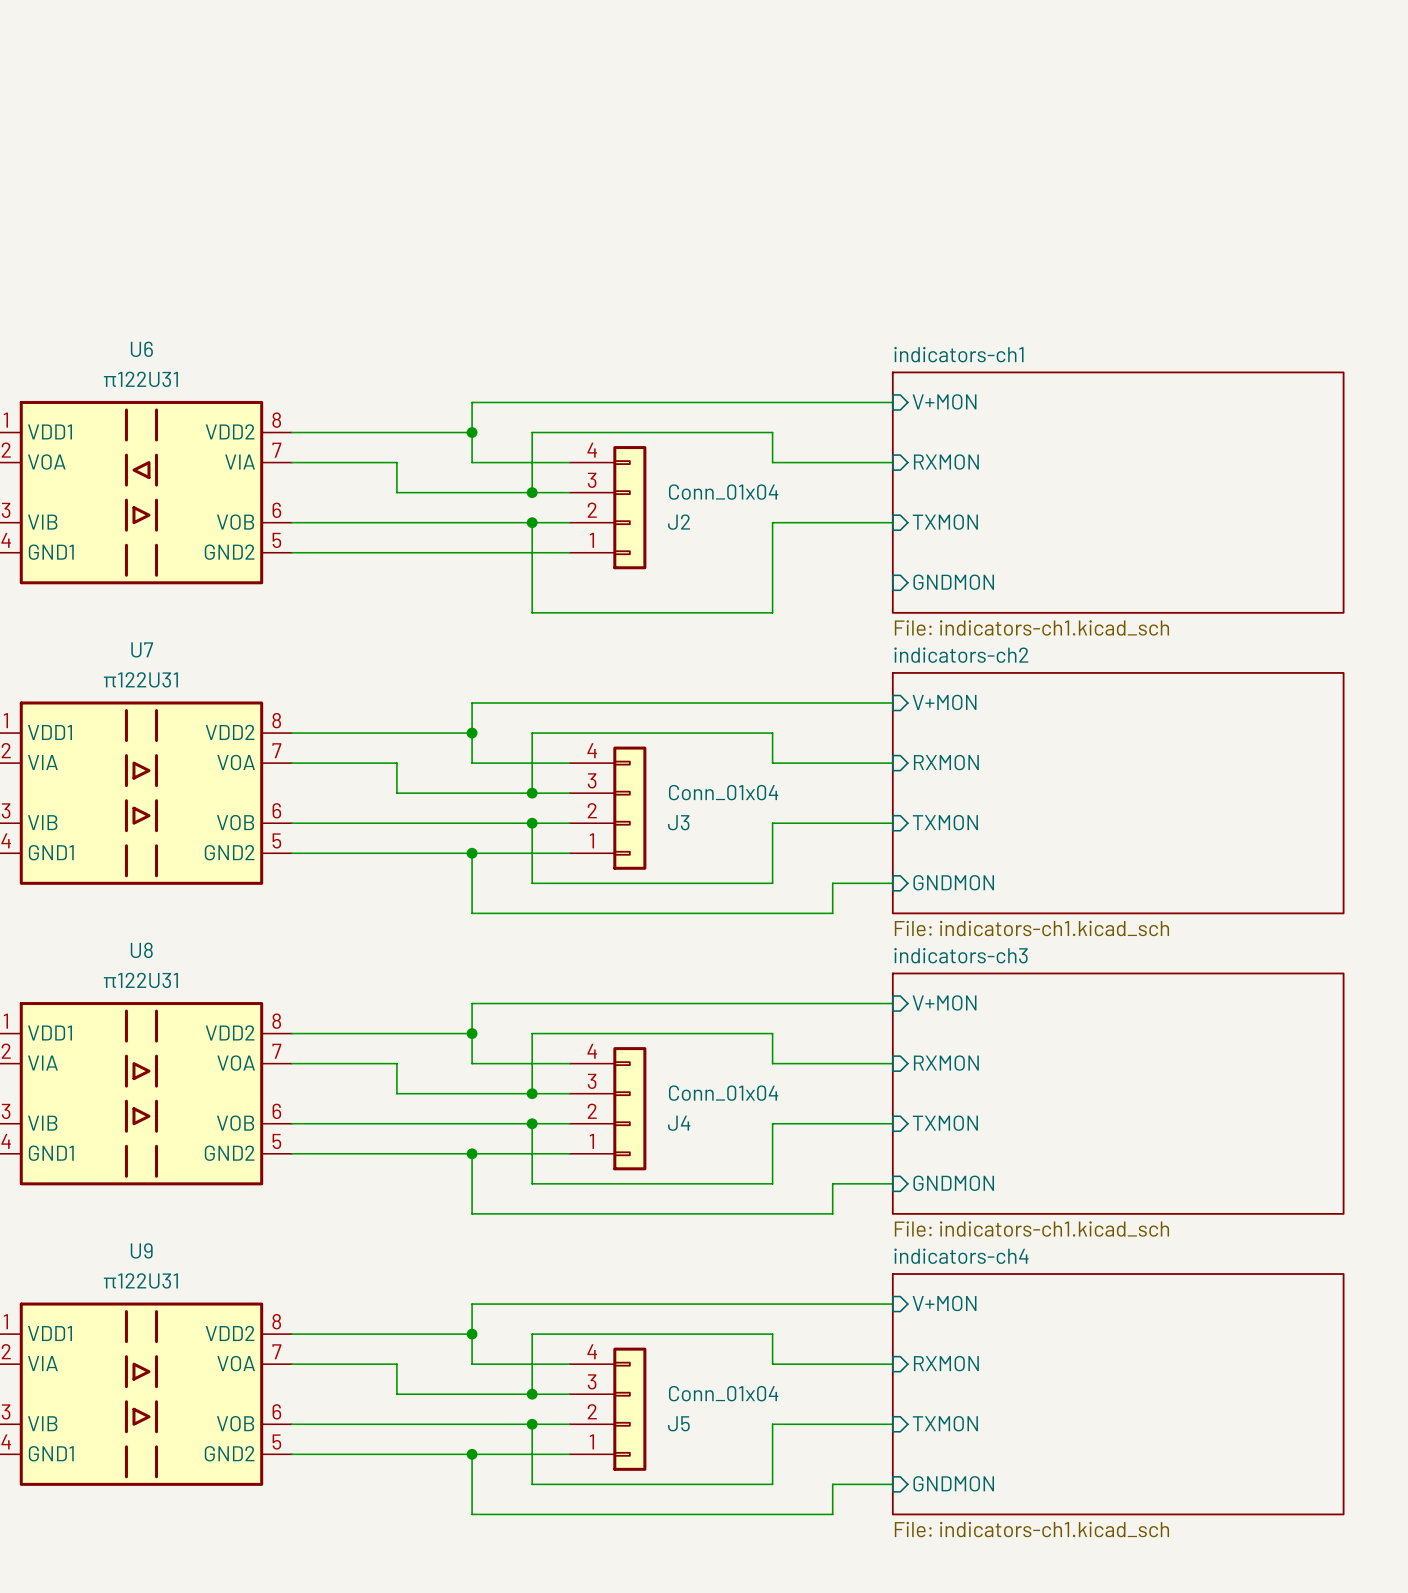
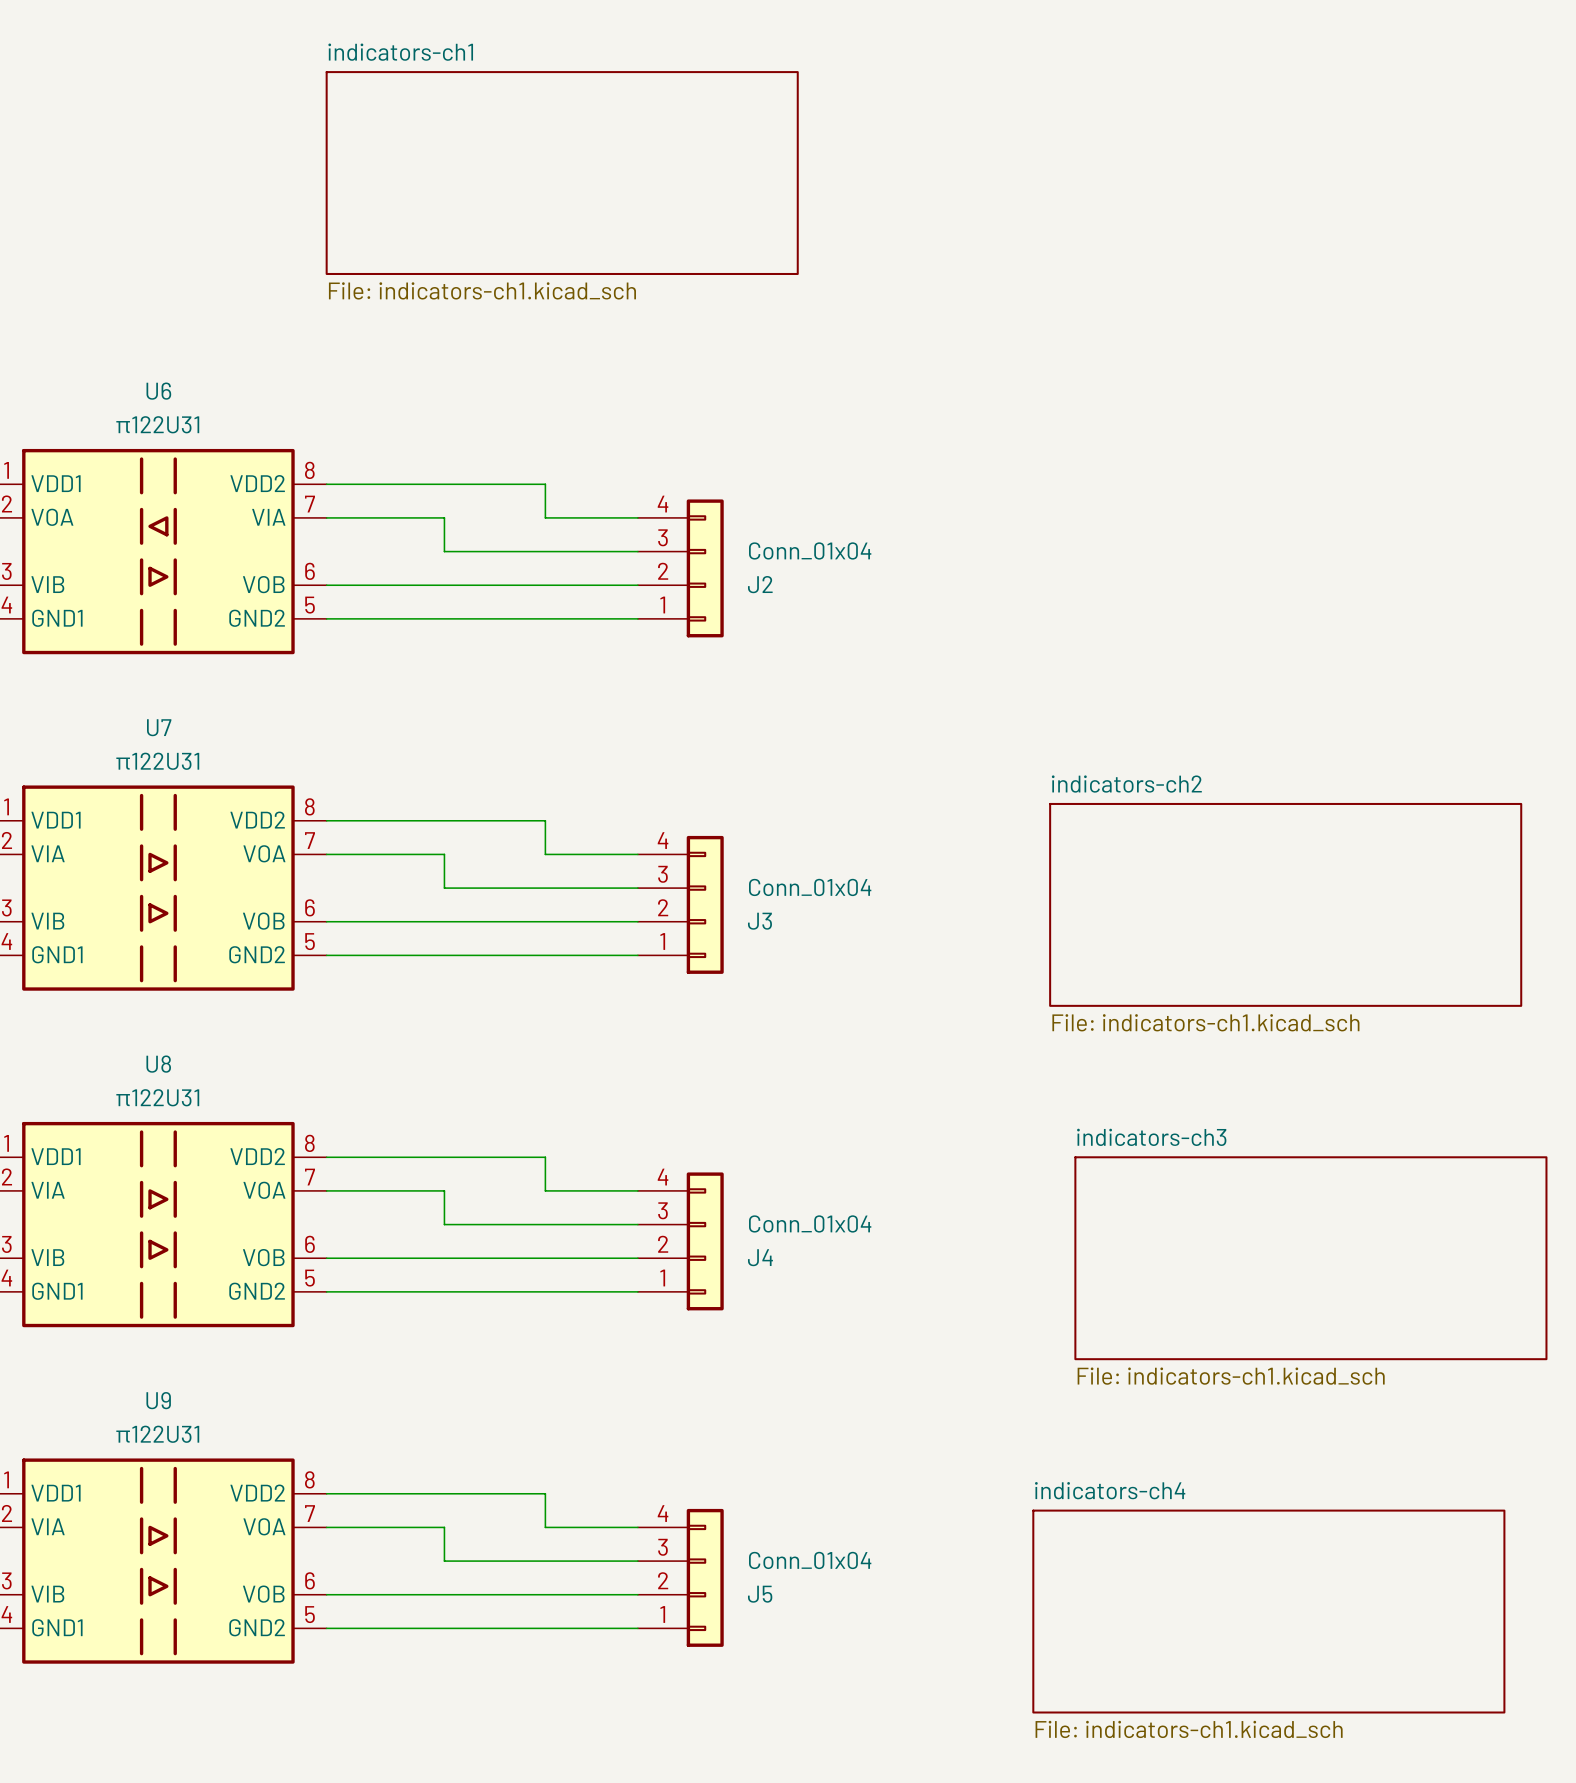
sheet indicators-ch1 name position: indicators-ch1 (958, 354) -> indicators-ch1 (400, 52)
sheet indicators-ch1 shape: [891, 371, 1345, 614] -> [325, 71, 799, 275]
sheet pin: V+MON (944, 401) -> none
wire: (892, 402) (472, 402) (472, 462) (487, 462) -> (528, 484) (545, 484) (545, 517)
junction: (472, 432) -> none
wire: (892, 462) (772, 462) (772, 432) (532, 432) (532, 492) -> none
sheet pin: RXMON (946, 462) -> none
junction: (532, 492) -> none
wire: (532, 522) (532, 612) (772, 612) (772, 522) (892, 522) -> none
junction: (532, 522) -> none
sheet pin: TXMON (945, 522) -> none
sheet pin: GNDMON (953, 582) -> none
sheet indicators-ch1 value position: File: indicators-ch1.kicad_sch (1031, 627) -> File: indicators-ch1.kicad_sch (482, 290)
sheet indicators-ch2 name position: indicators-ch2 (961, 655) -> indicators-ch2 (1126, 784)
sheet indicators-ch2 shape: [891, 672, 1345, 915] -> [1049, 802, 1523, 1007]
sheet pin: V+MON (944, 702) -> none
wire: (892, 703) (472, 703) (472, 763) (487, 763) -> (528, 820) (545, 820) (545, 854)
junction: (472, 733) -> none
sheet pin: RXMON (946, 762) -> none
wire: (892, 763) (772, 763) (772, 733) (532, 733) (532, 793) -> none
junction: (532, 793) -> none
sheet pin: TXMON (945, 822) -> none
wire: (532, 823) (532, 883) (772, 883) (772, 823) (892, 823) -> none
junction: (532, 823) -> none
wire: (472, 853) (472, 913) (832, 913) (832, 883) (892, 883) -> none
junction: (472, 853) -> none
sheet pin: GNDMON (953, 882) -> none
sheet indicators-ch2 value position: File: indicators-ch1.kicad_sch (1031, 928) -> File: indicators-ch1.kicad_sch (1205, 1022)
sheet indicators-ch3 name position: indicators-ch3 (961, 955) -> indicators-ch3 (1151, 1137)
sheet indicators-ch3 shape: [891, 972, 1345, 1215] -> [1074, 1156, 1548, 1361]
sheet pin: V+MON (944, 1002) -> none
wire: (892, 1003) (472, 1003) (472, 1063) (487, 1063) -> (528, 1157) (545, 1157) (545, 1190)
junction: (472, 1033) -> none
wire: (892, 1063) (772, 1063) (772, 1033) (532, 1033) (532, 1093) -> none
sheet pin: RXMON (946, 1063) -> none
junction: (532, 1093) -> none
wire: (532, 1123) (532, 1183) (772, 1183) (772, 1123) (892, 1123) -> none
junction: (532, 1123) -> none
sheet pin: TXMON (945, 1123) -> none
wire: (472, 1153) (472, 1213) (832, 1213) (832, 1183) (892, 1183) -> none
junction: (472, 1153) -> none
sheet pin: GNDMON (953, 1183) -> none
sheet indicators-ch3 value position: File: indicators-ch1.kicad_sch (1031, 1229) -> File: indicators-ch1.kicad_sch (1231, 1376)
sheet indicators-ch4 name position: indicators-ch4 (961, 1256) -> indicators-ch4 (1110, 1490)
sheet indicators-ch4 shape: [891, 1273, 1345, 1516] -> [1032, 1509, 1506, 1714]
sheet pin: V+MON (944, 1303) -> none
wire: (892, 1304) (472, 1304) (472, 1364) (487, 1364) -> (528, 1493) (545, 1493) (545, 1527)
junction: (472, 1334) -> none
sheet pin: RXMON (946, 1363) -> none
wire: (892, 1364) (772, 1364) (772, 1334) (532, 1334) (532, 1394) -> none
junction: (532, 1394) -> none
sheet pin: TXMON (945, 1423) -> none
wire: (532, 1424) (532, 1484) (772, 1484) (772, 1424) (892, 1424) -> none
junction: (532, 1424) -> none
wire: (472, 1454) (472, 1514) (832, 1514) (832, 1484) (892, 1484) -> none
junction: (472, 1454) -> none
sheet pin: GNDMON (953, 1483) -> none
sheet indicators-ch4 value position: File: indicators-ch1.kicad_sch (1031, 1529) -> File: indicators-ch1.kicad_sch (1189, 1729)

